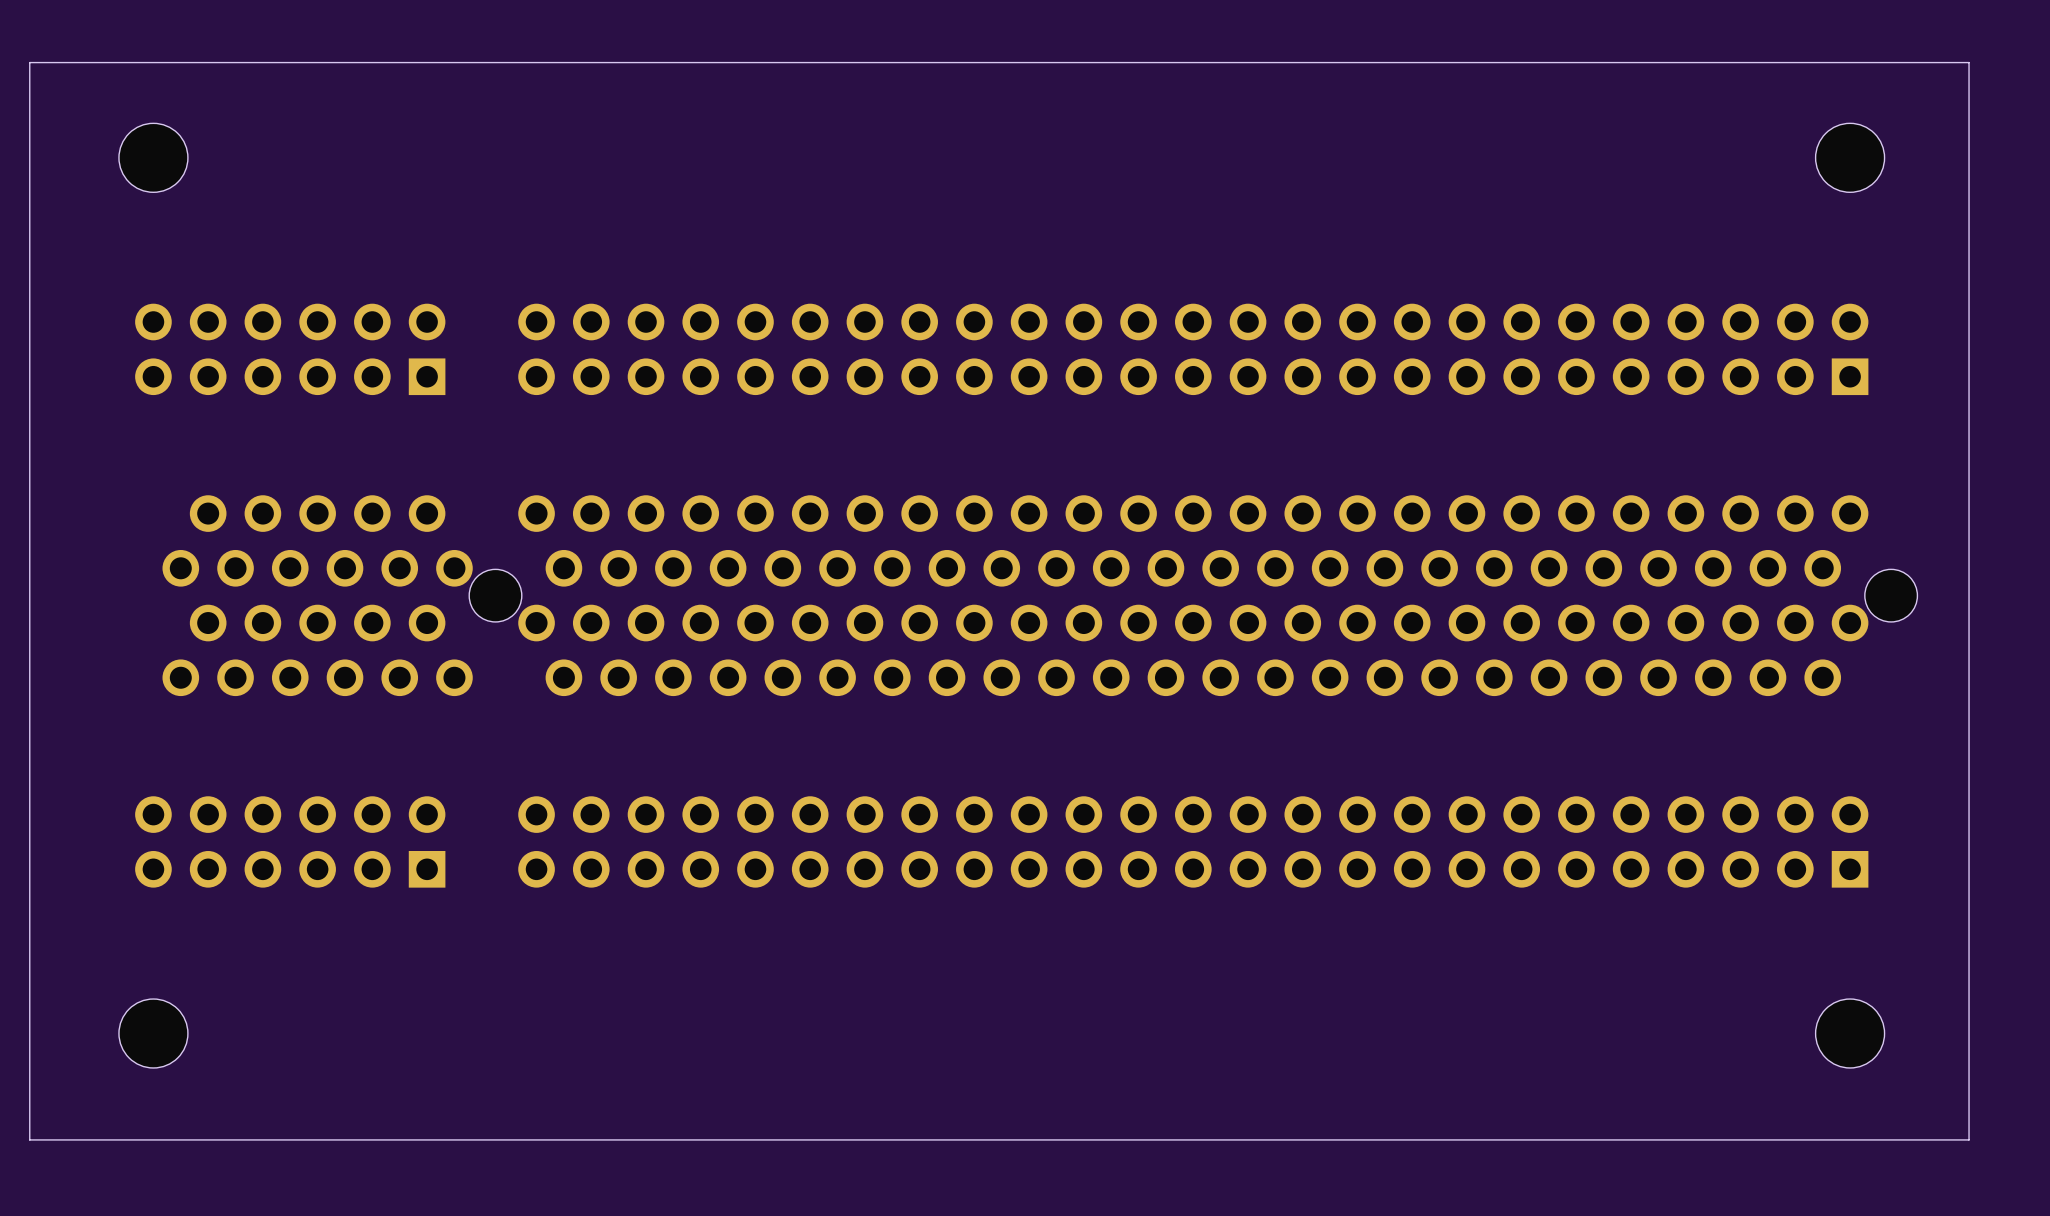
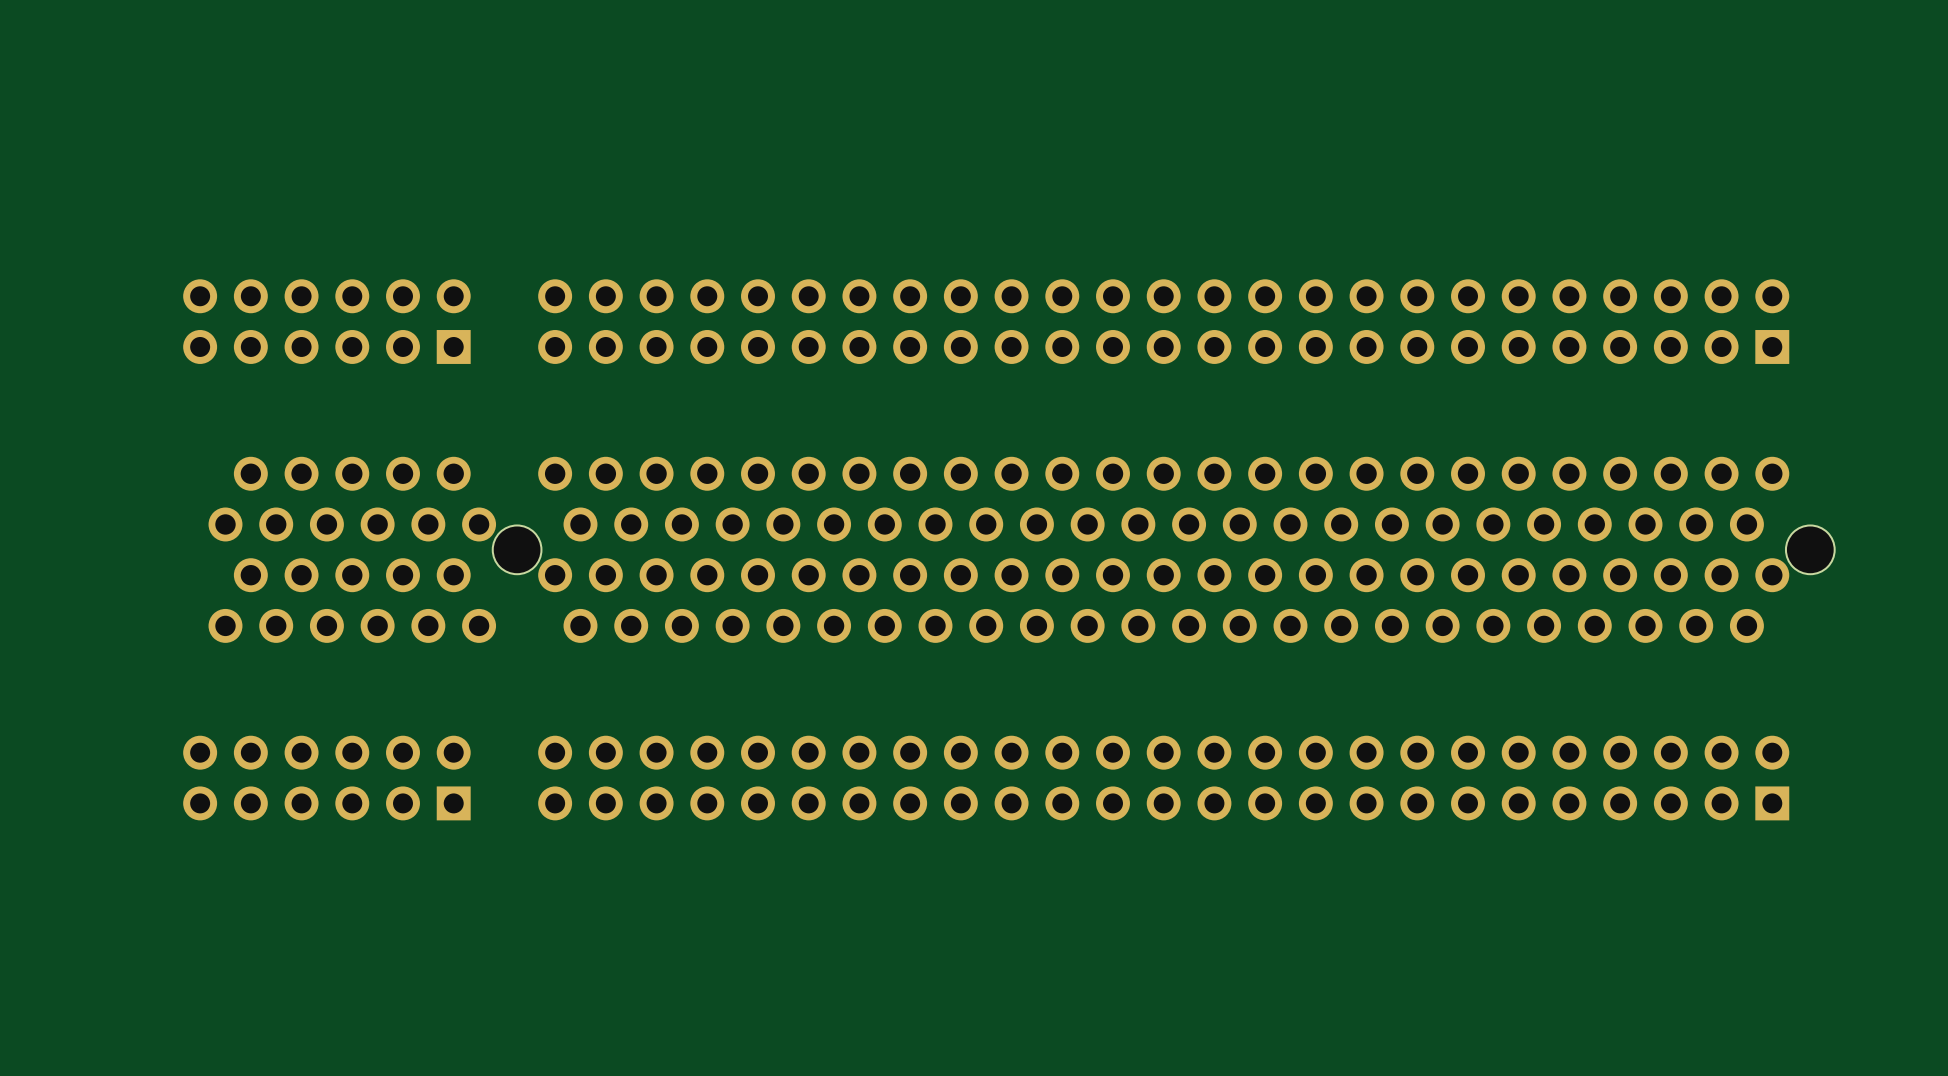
board edge: (1969, 62) (29, 62) (29, 1139) (1969, 1139) (1969, 62) -> none
part: (153, 157) -> none
part: (1850, 157) -> none
part: (153, 1033) -> none
part: (1850, 1033) -> none

